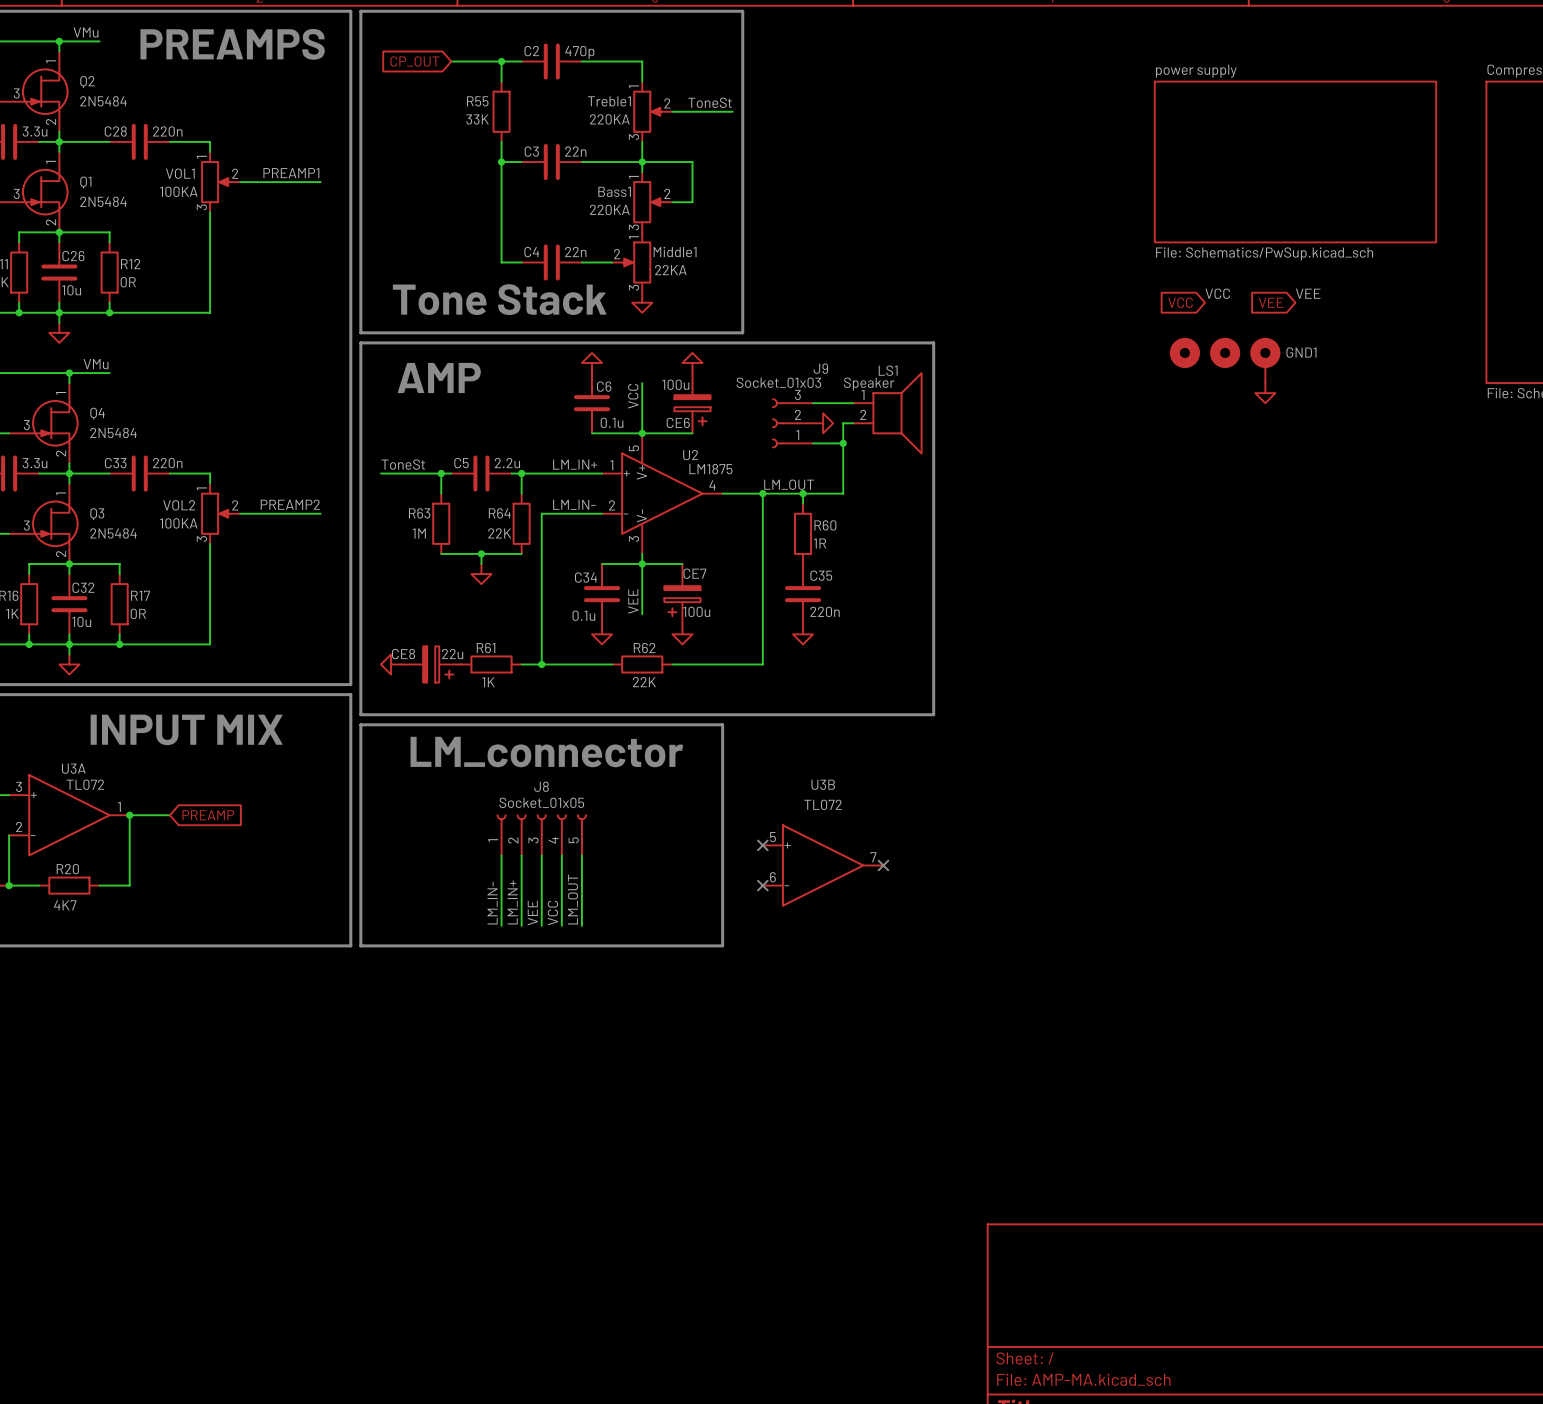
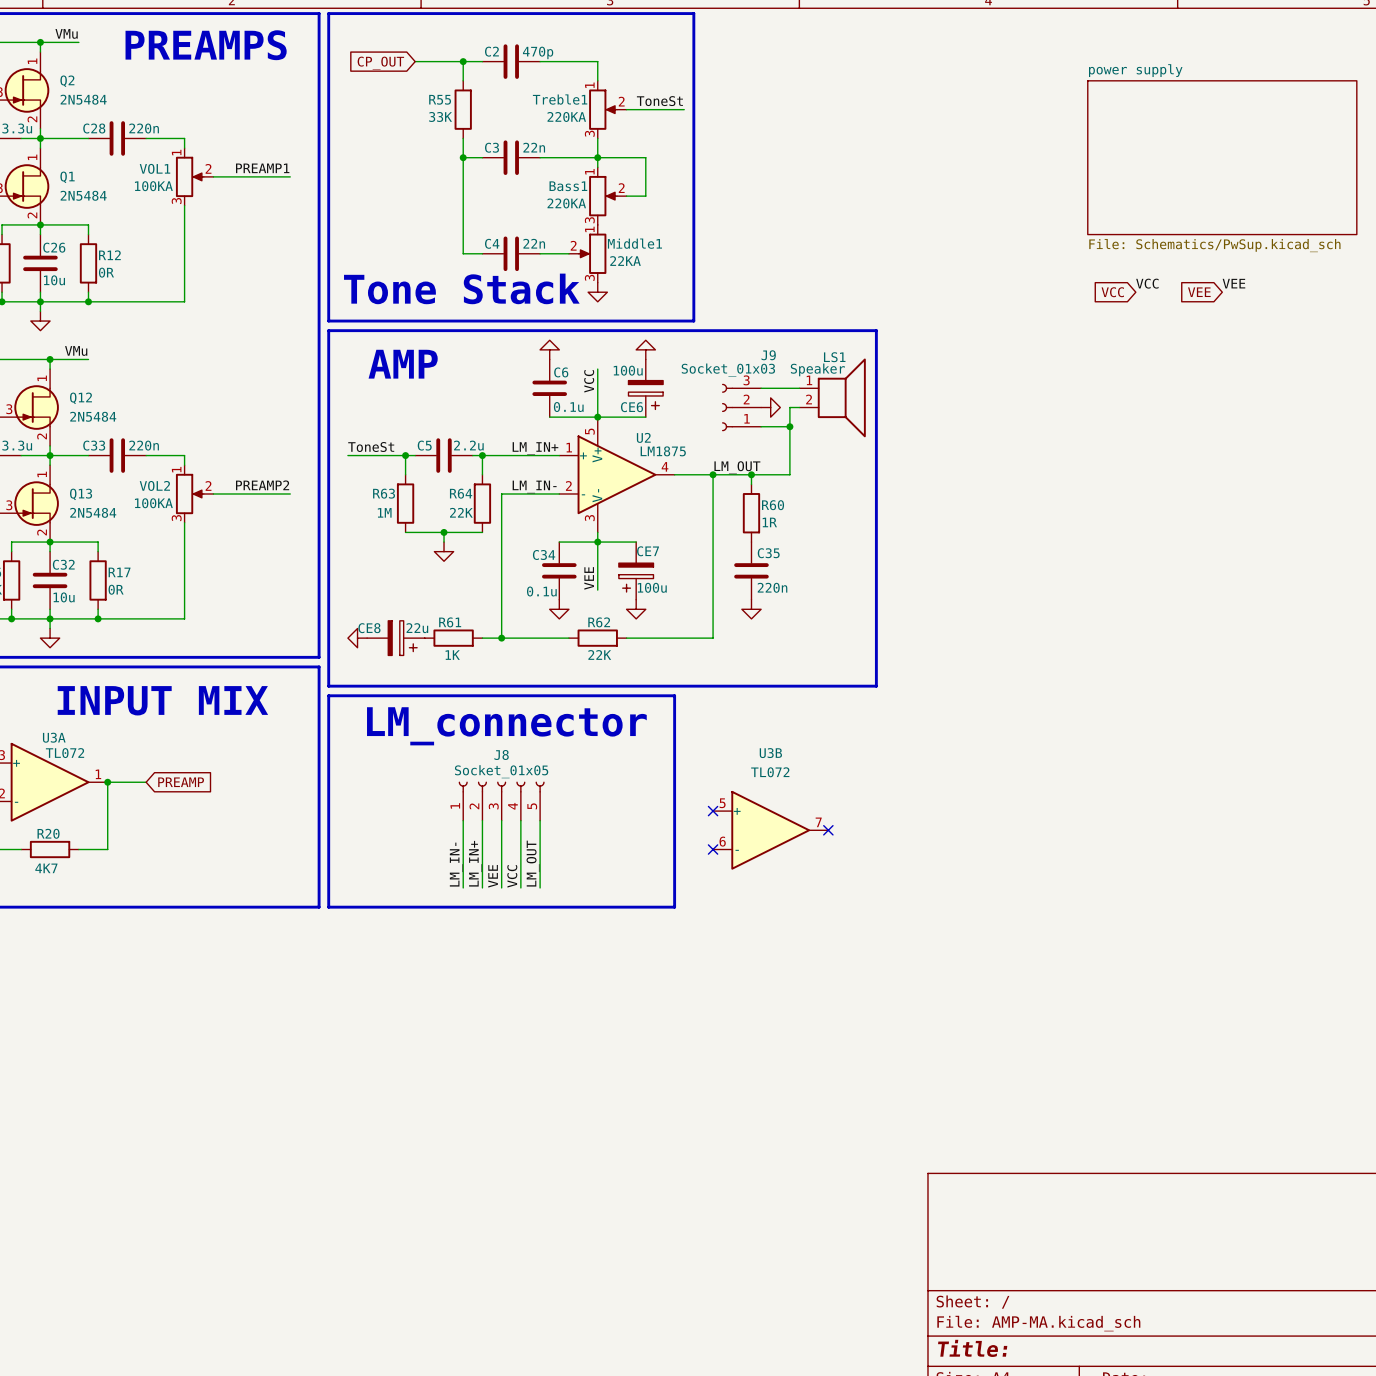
part: (1184, 352) -> none
part: (1225, 352) -> none
GND1: (1265, 360) -> none
power symbol: (1265, 393) -> none
Q4 name: Q4 (97, 413) -> Q12 (80, 398)
Q3 name: Q3 (97, 514) -> Q13 (81, 494)

